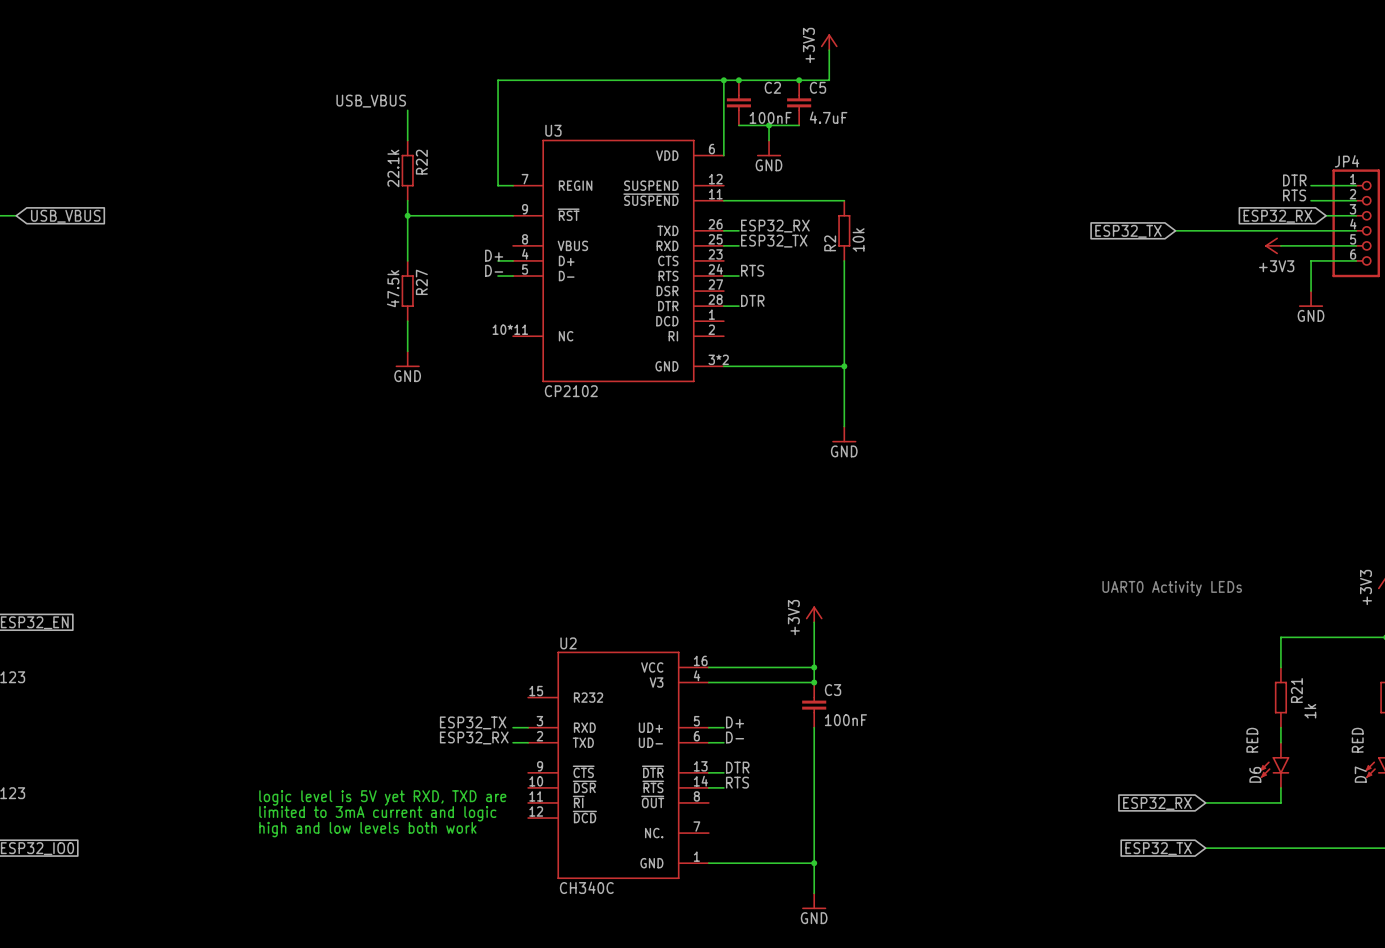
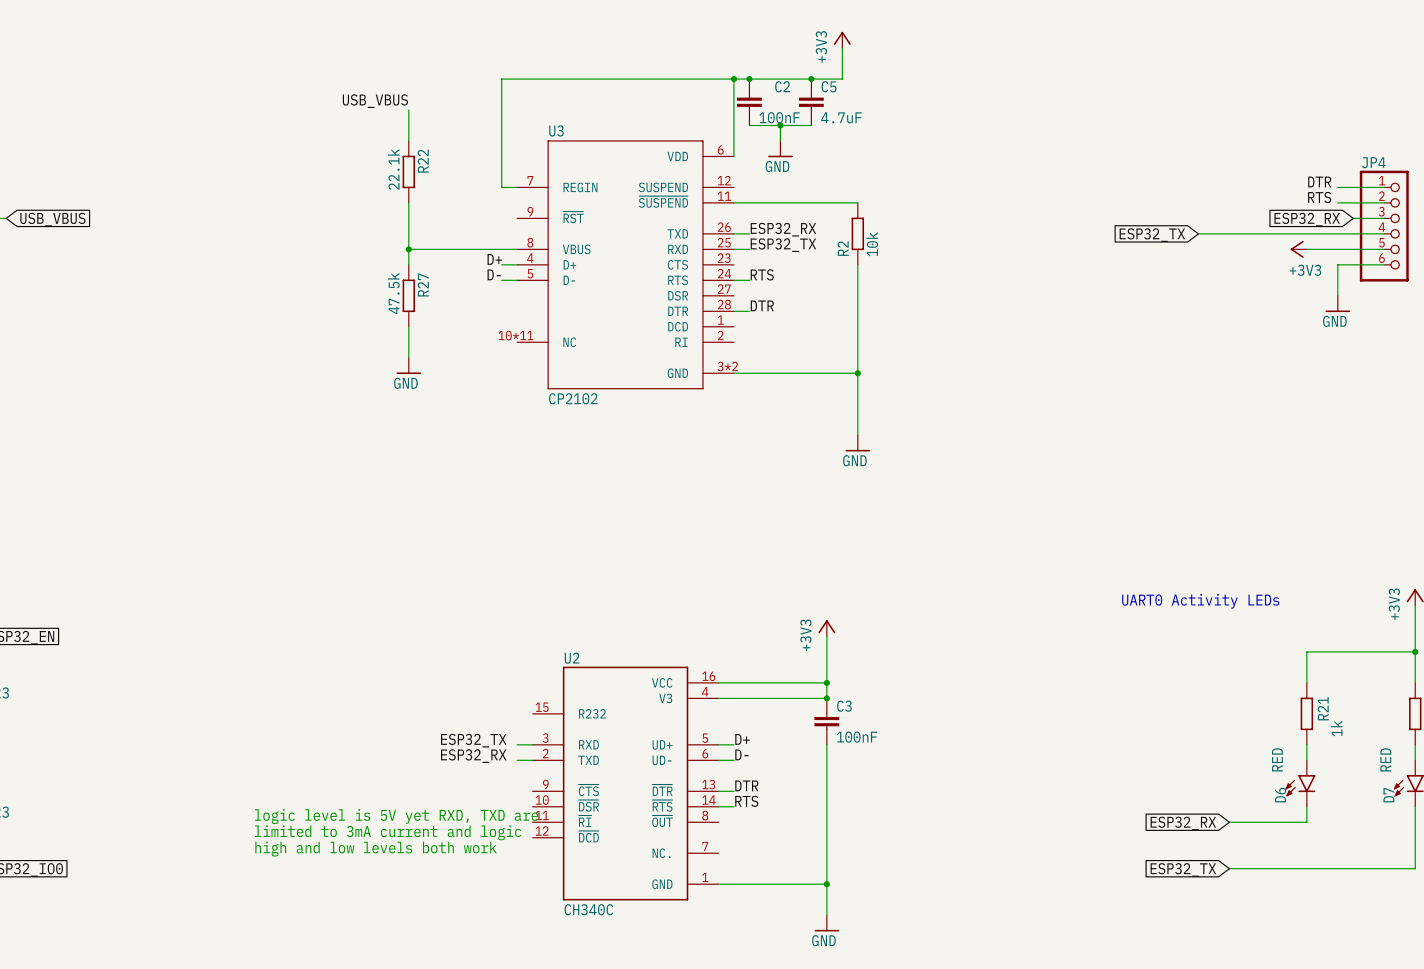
wire: (407, 215) (513, 215) -> (408, 249) (517, 249)
junction position: (407, 215) -> (408, 249)

